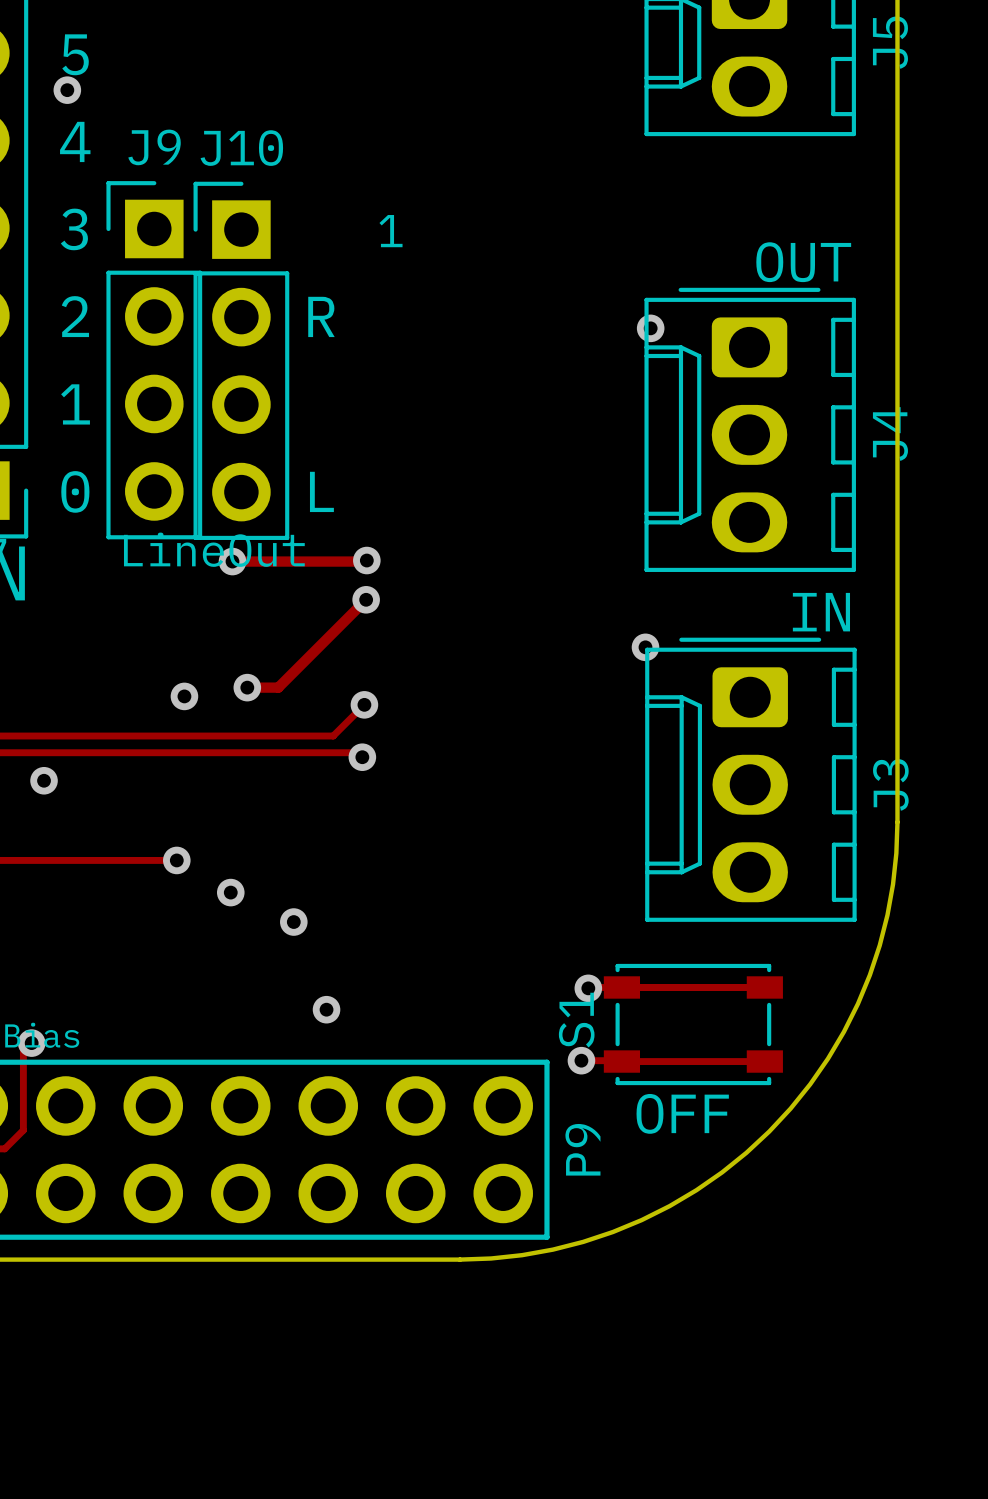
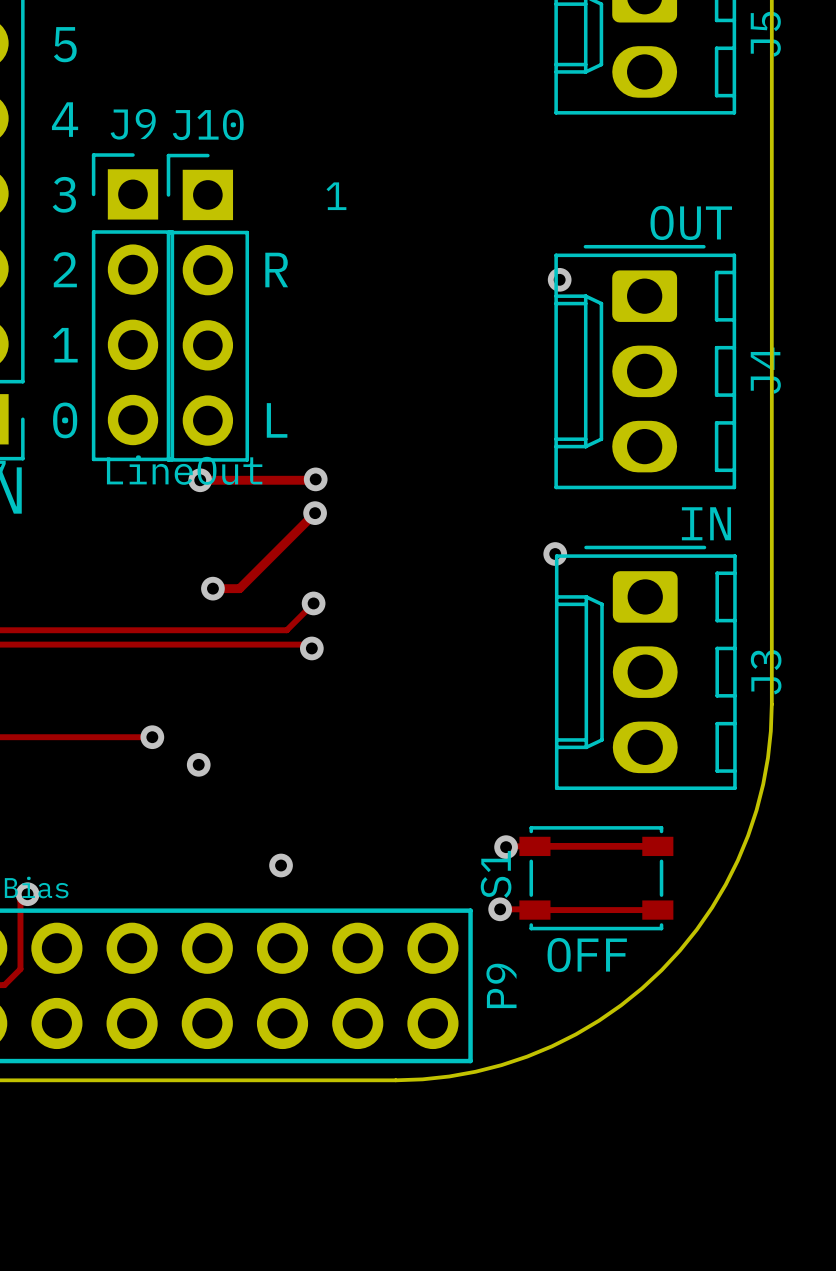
via: (67, 90) -> none
via: (184, 696) -> none
via: (44, 780) -> none
via: (293, 922) -> none

